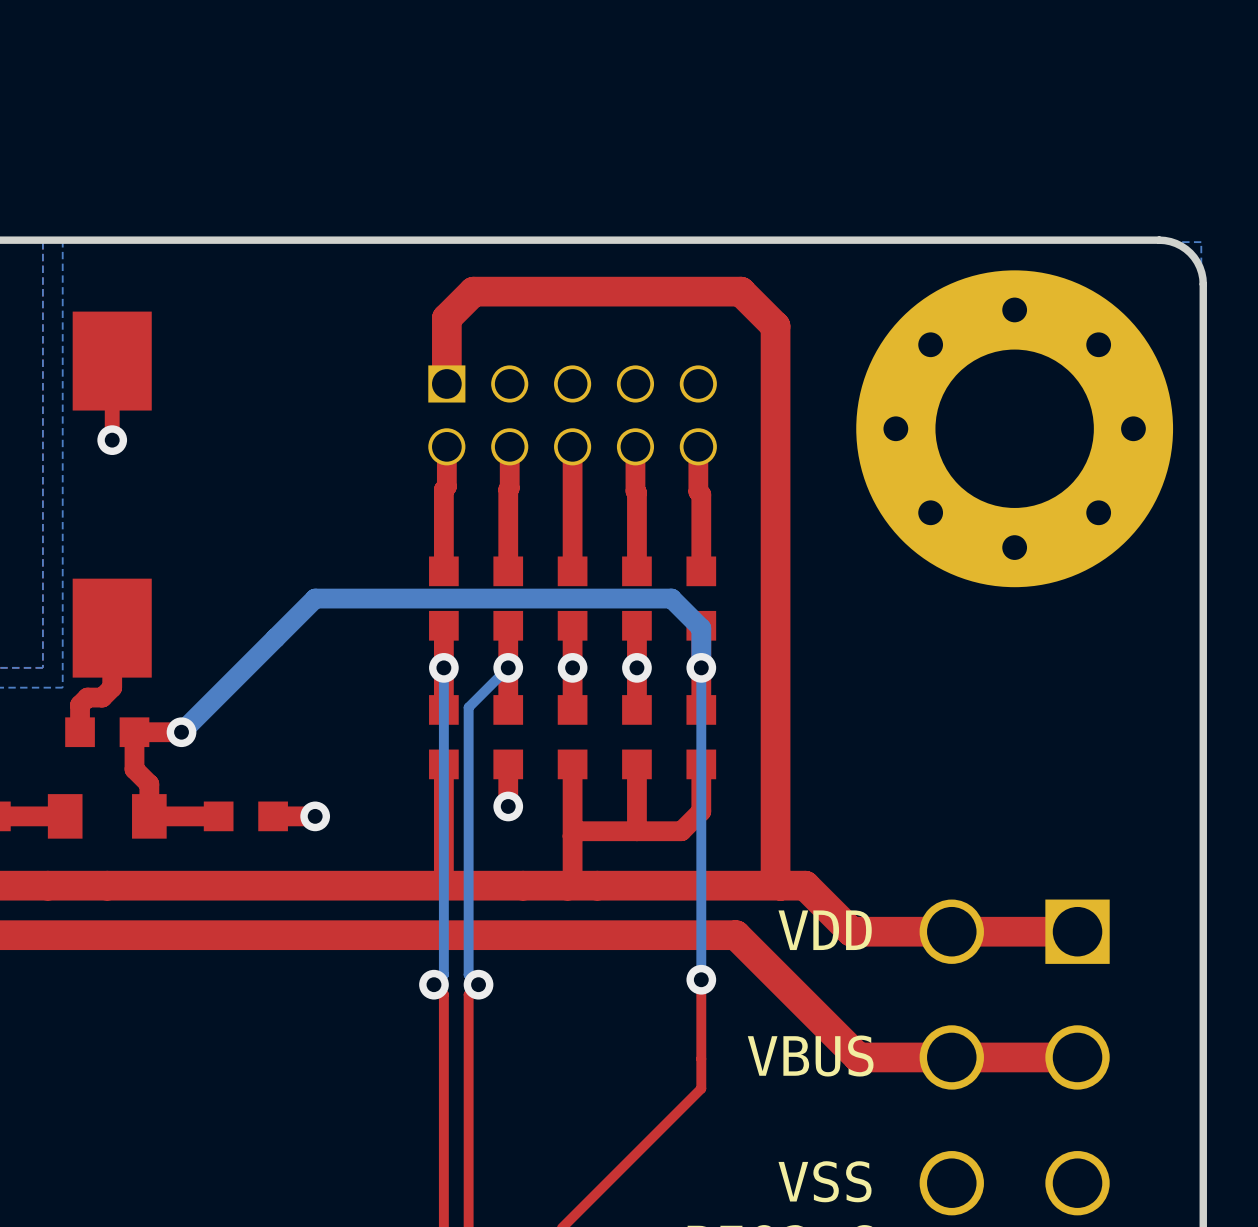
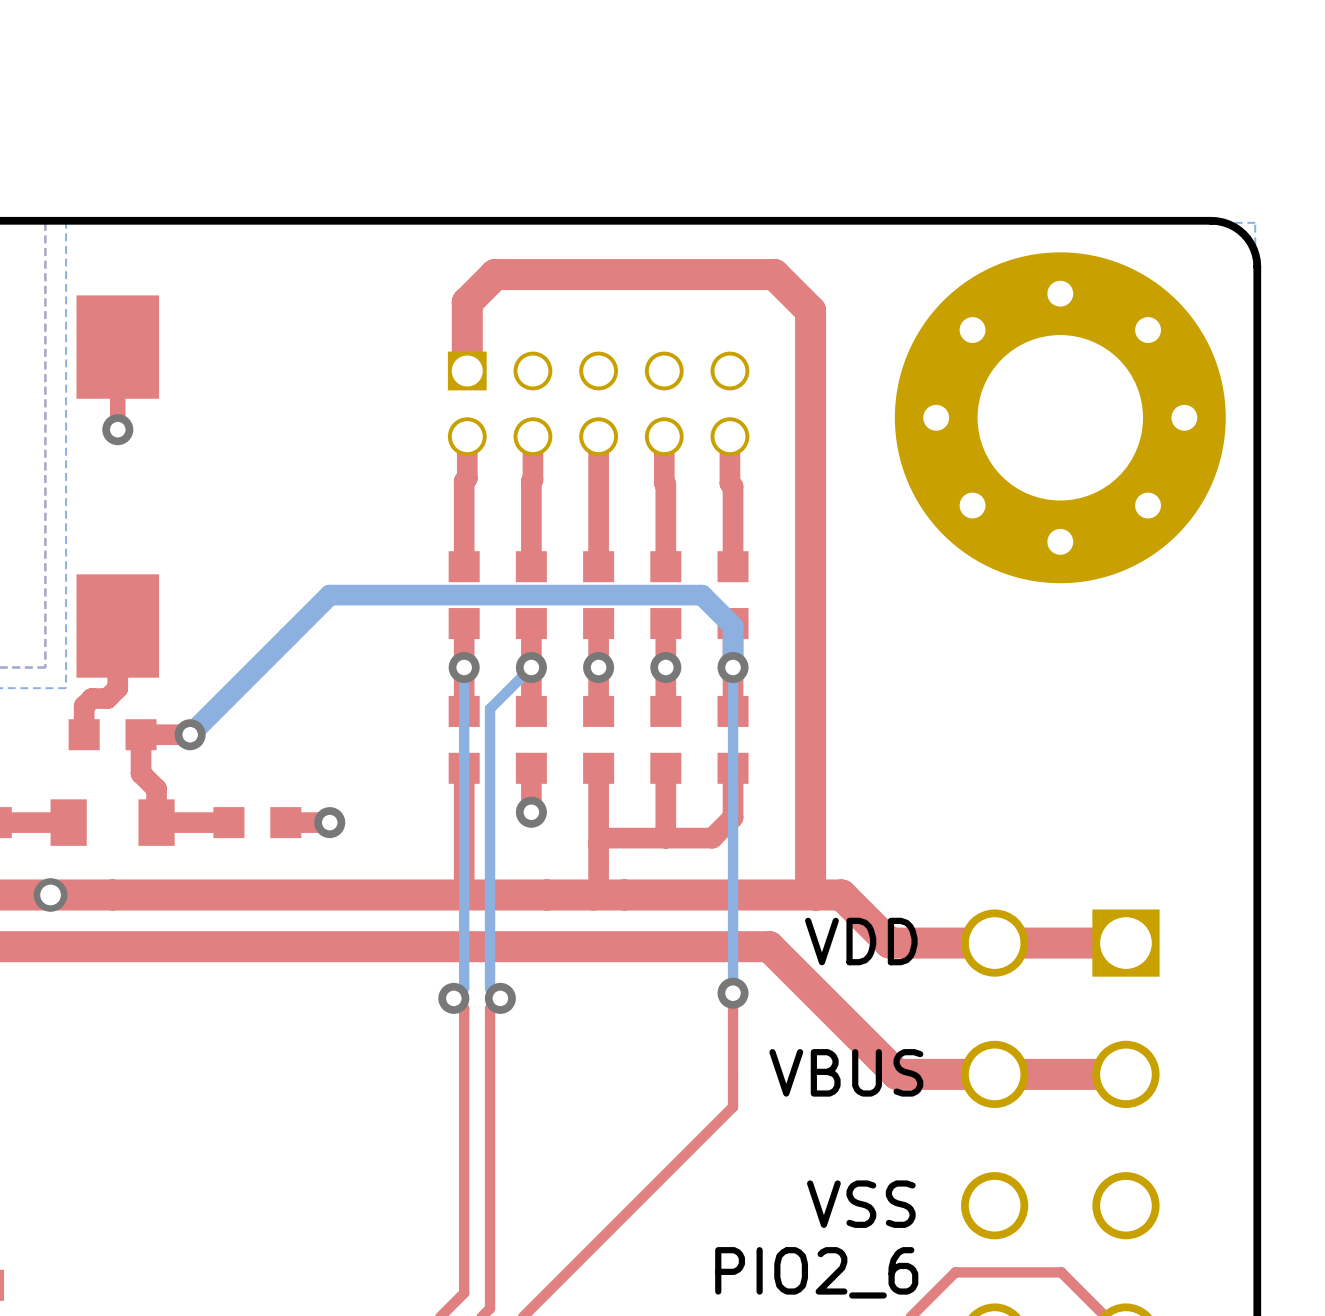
via: none -> (50, 894)

